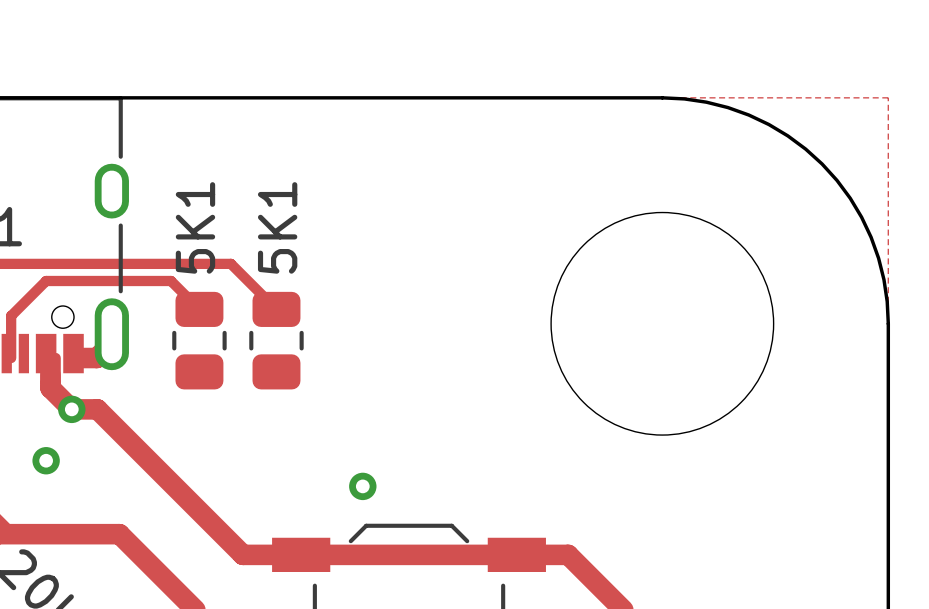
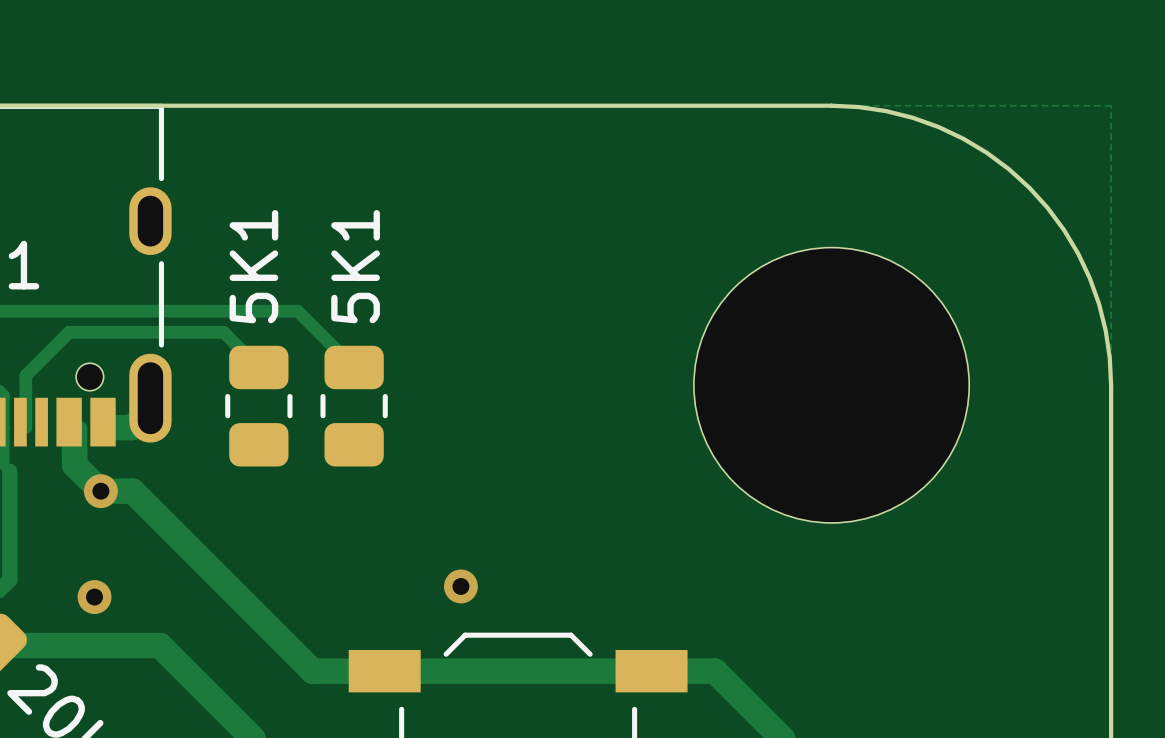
via position: (46, 460) -> (94, 597)

